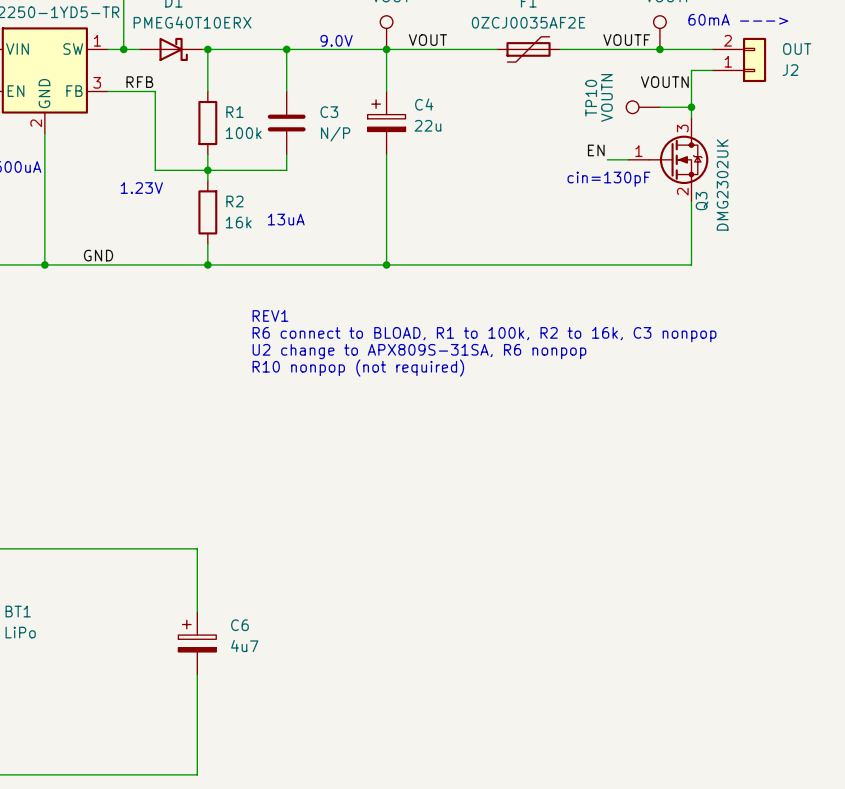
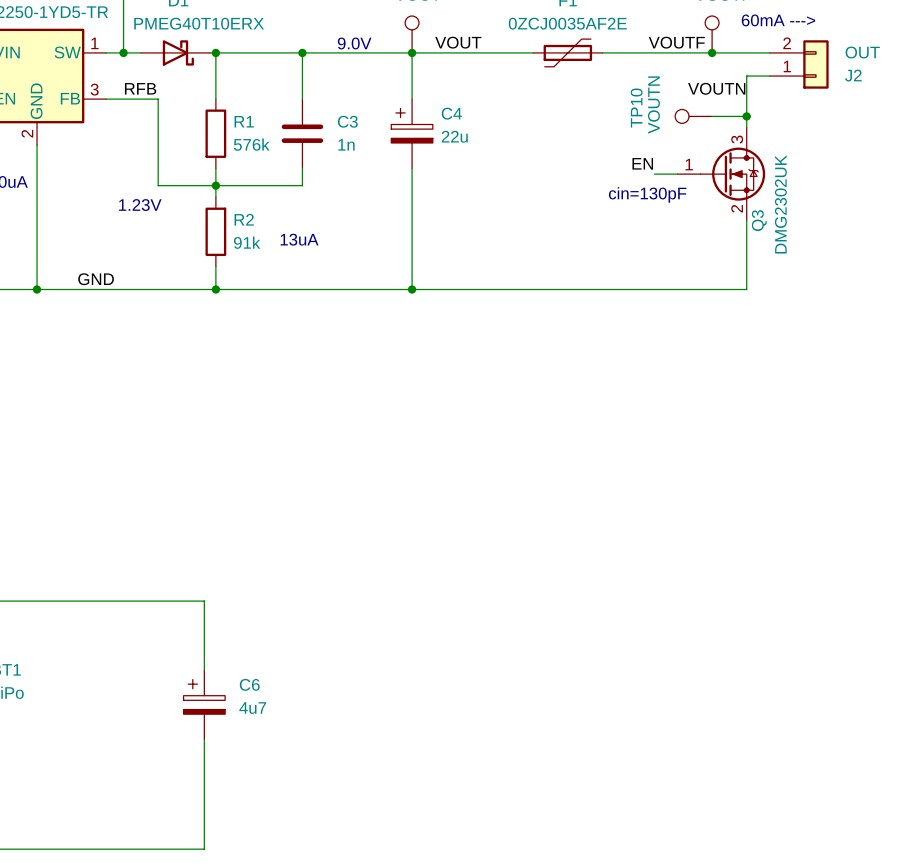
R1 value: 100k (243, 133) -> 576k (251, 144)
C3 value: N/P (335, 134) -> 1n (346, 144)
R2 value: 16k (238, 222) -> 91k (247, 242)
text: REV1 (270, 315) -> none
text: R6 connect to BLOAD, R1 to 100k, R2 to 16k, C3 nonpop (484, 334) -> none
text: U2 change to APX809S-31SA, R6 nonpop (419, 351) -> none
text: R10 nonpop (not required) (358, 368) -> none

